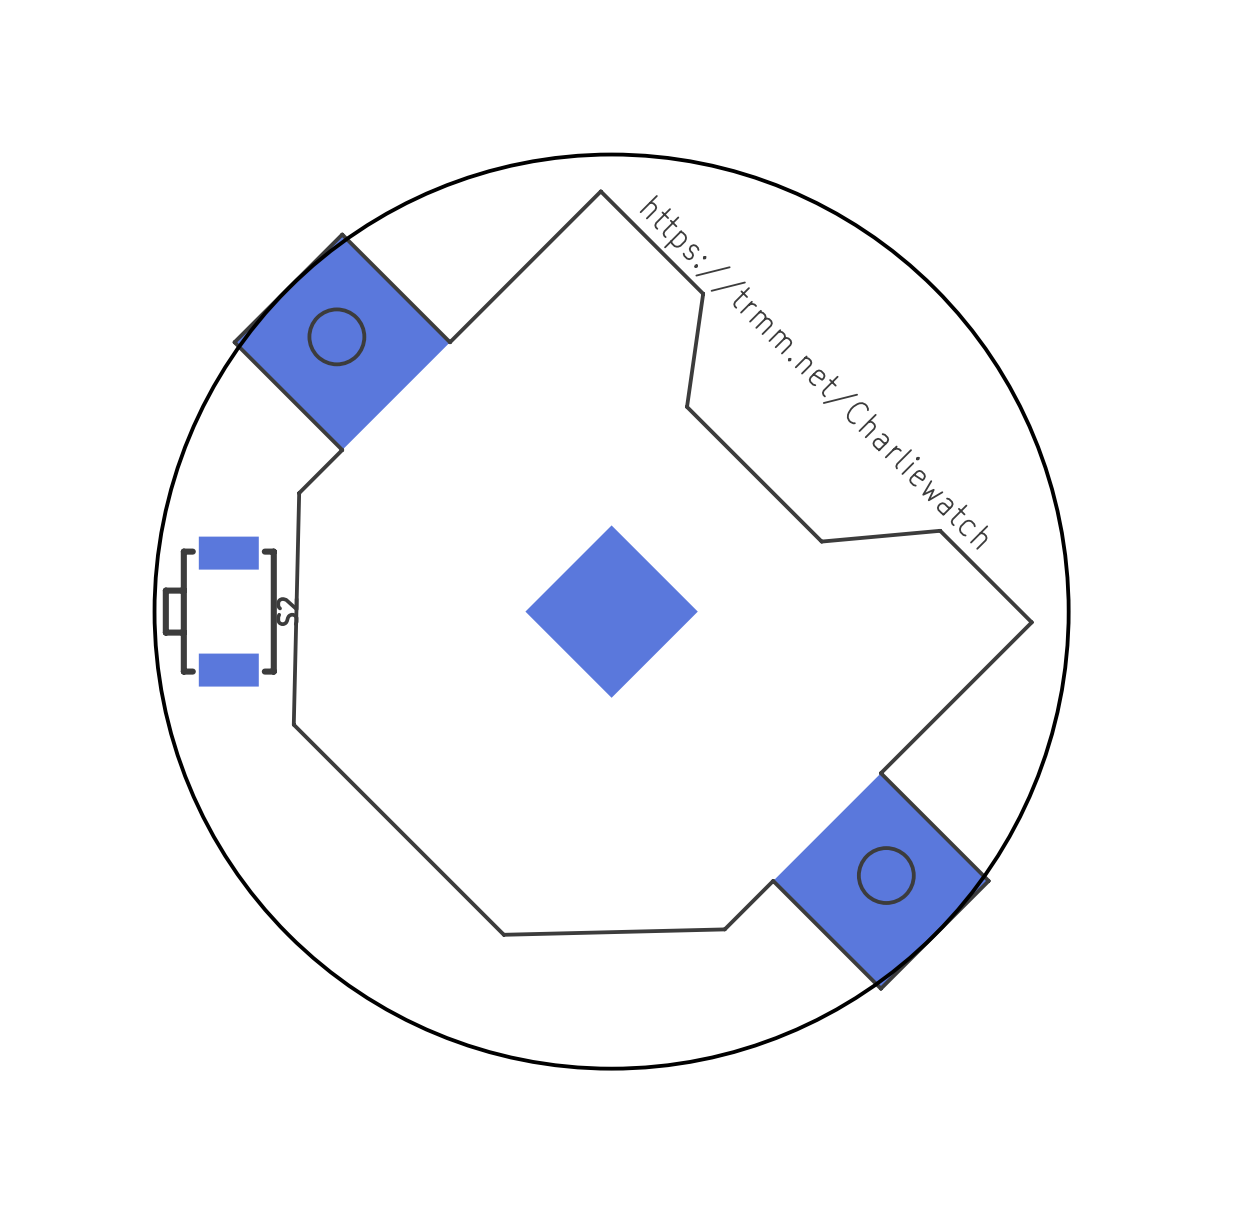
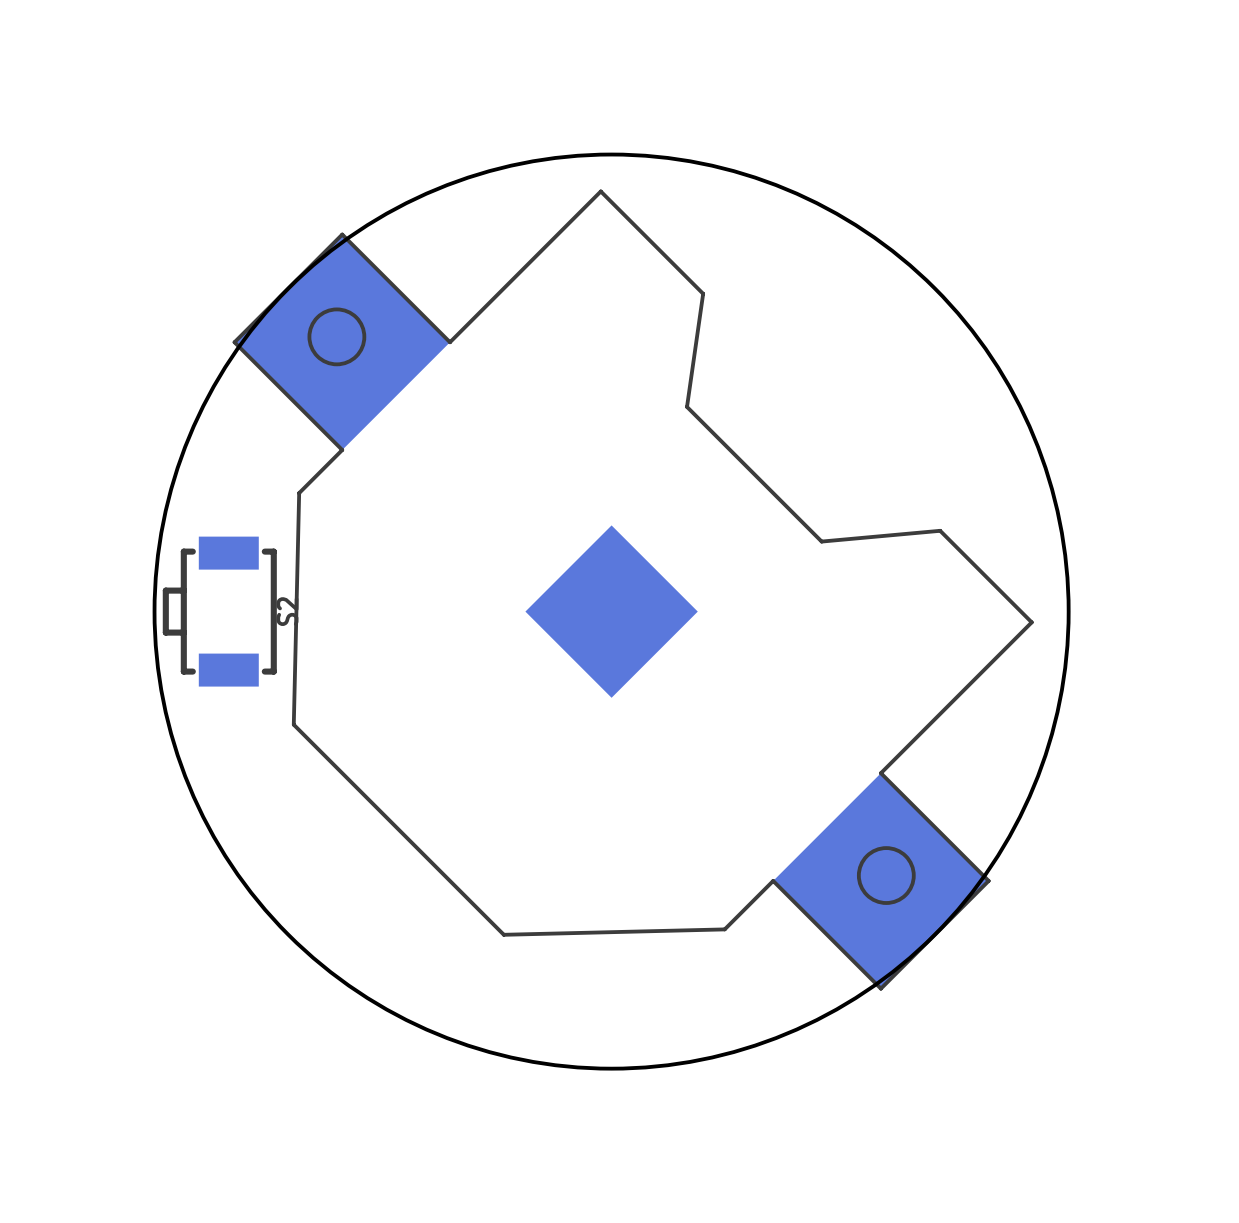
text: https://trmm.net/Charliewatch (813, 372) -> none

